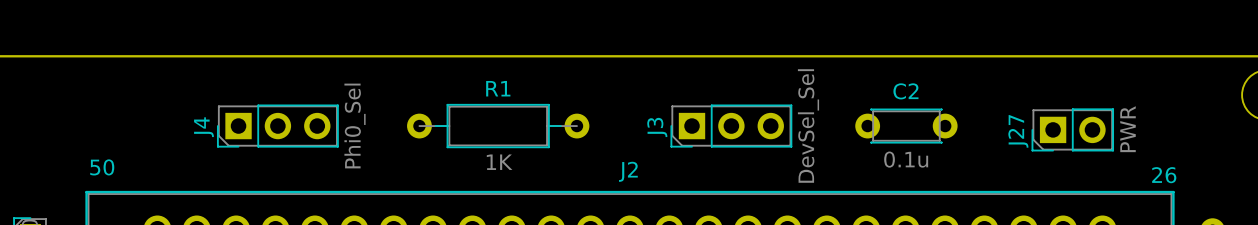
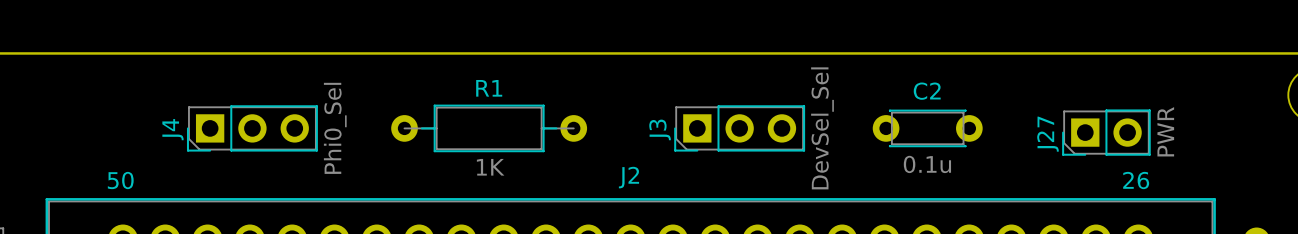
J2 text position: 50 (102, 167) -> 50 (120, 180)
J2 text position: 26 (1164, 175) -> 26 (1136, 180)

